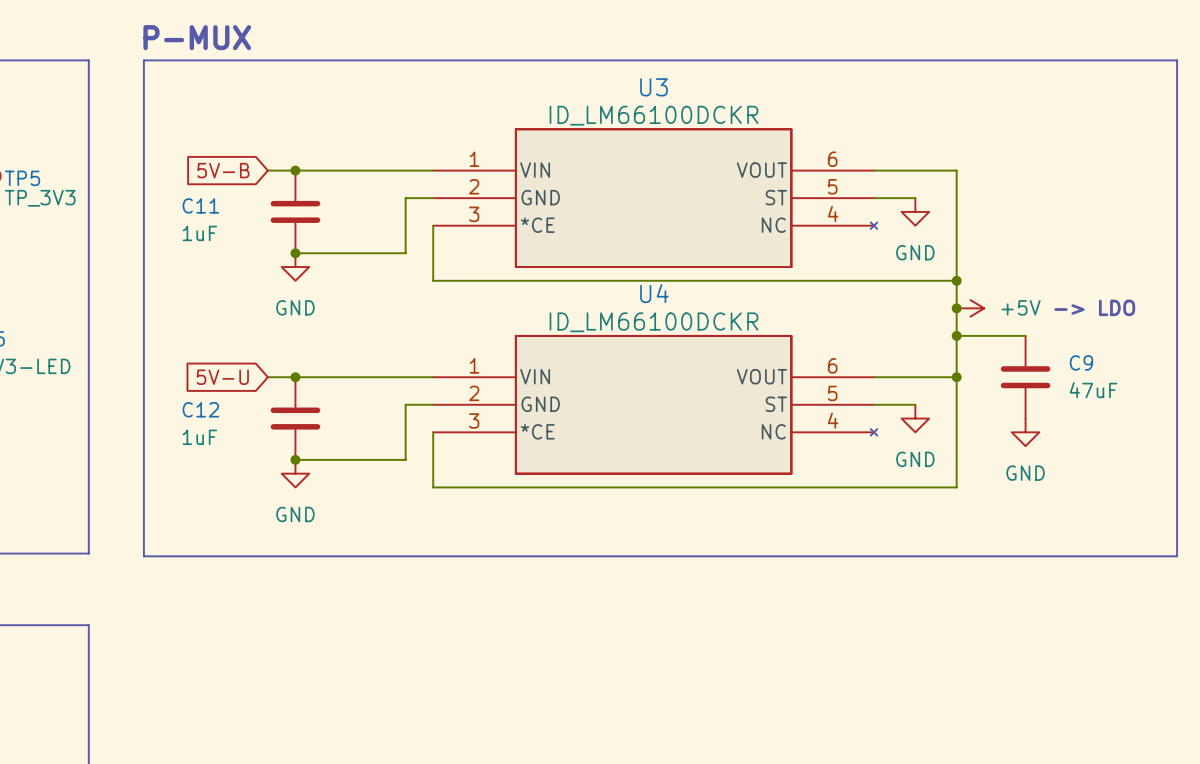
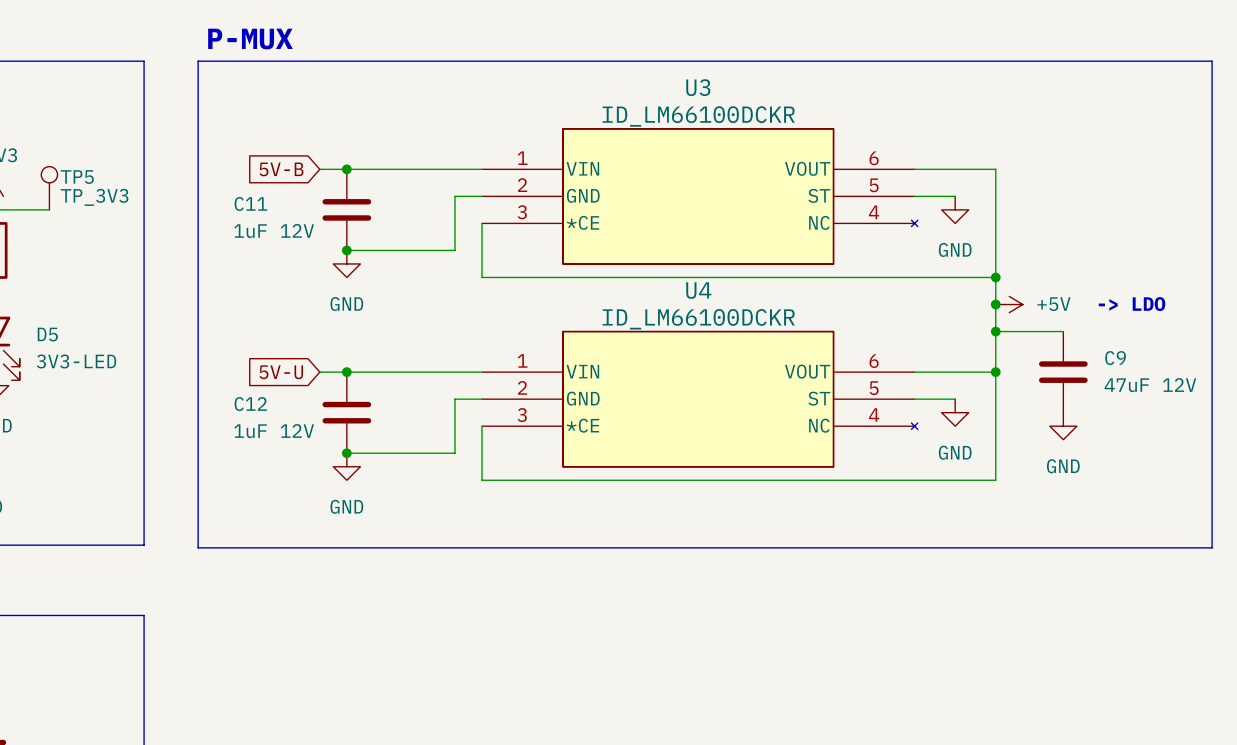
C11 value: 1uF (199, 233) -> 1uF 12V (274, 231)
C9 value: 47uF (1093, 390) -> 47uF 12V (1150, 385)
C12 value: 1uF (199, 437) -> 1uF 12V (274, 431)

